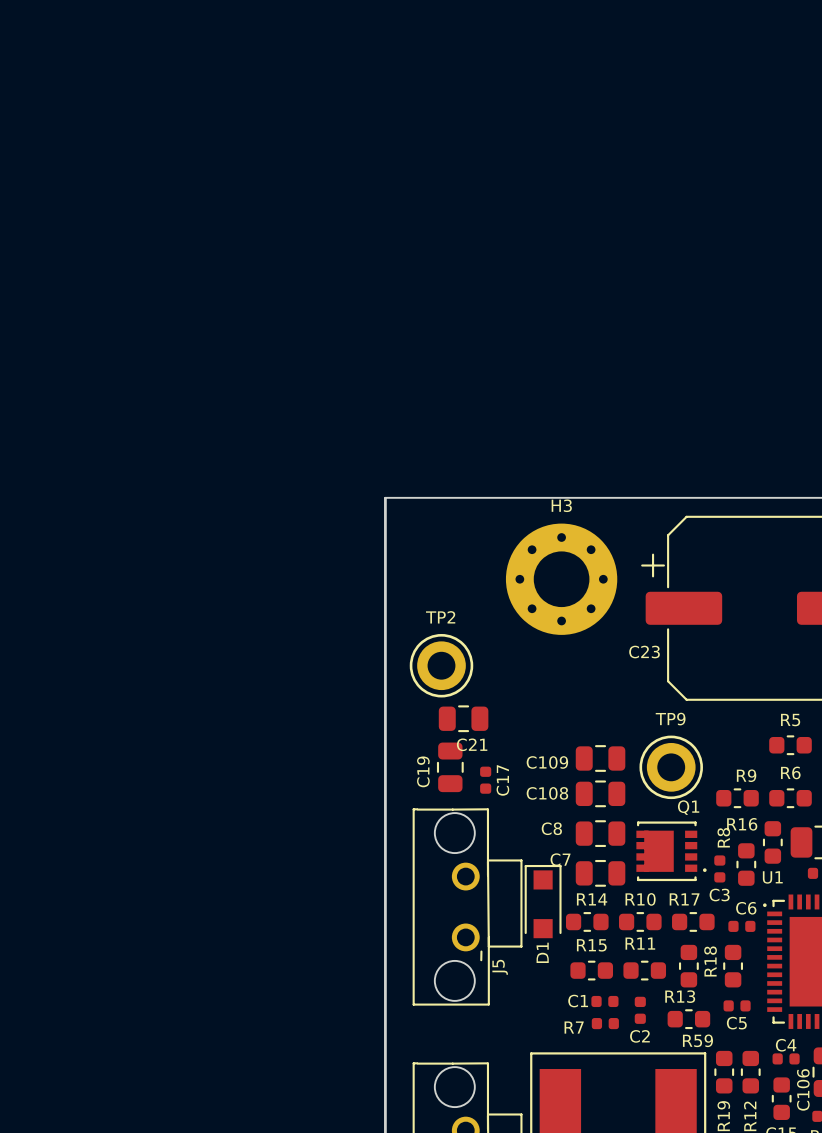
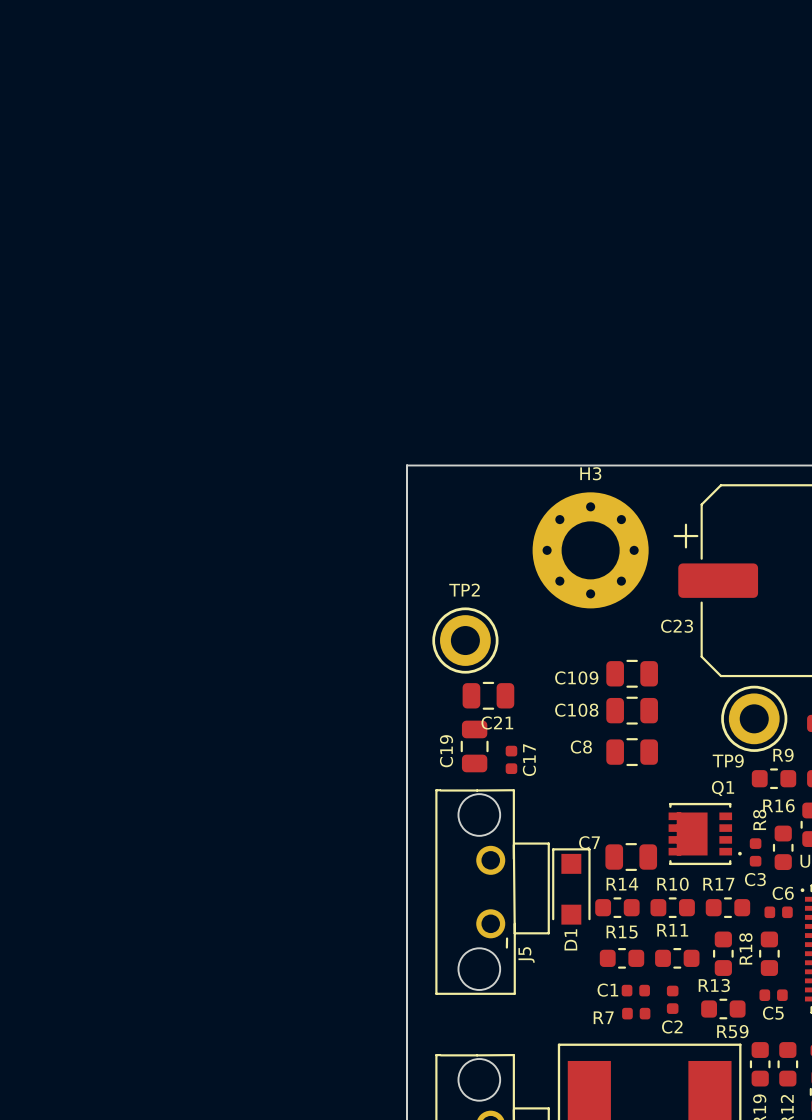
TP9 name position: TP9 (670, 719) -> TP9 (728, 760)
C109 position: (600, 758) -> (632, 673)
TP9 position: (671, 767) -> (754, 718)
C108 position: (600, 793) -> (632, 710)
C8 position: (600, 833) -> (632, 752)

